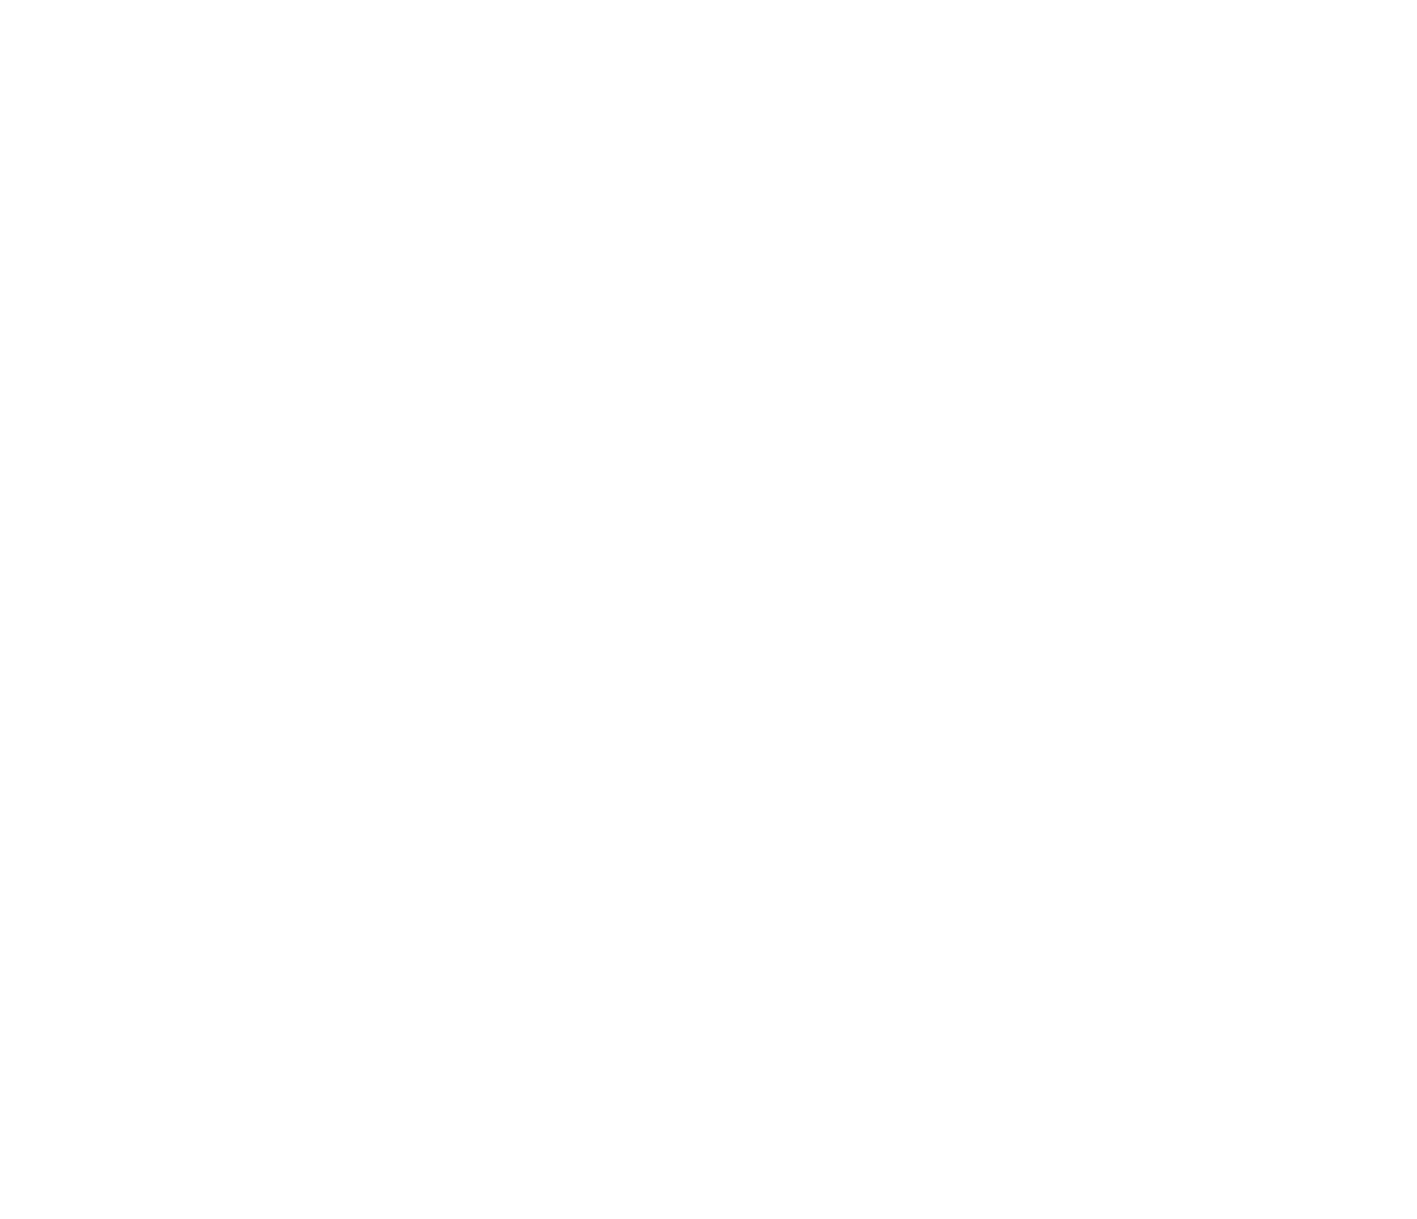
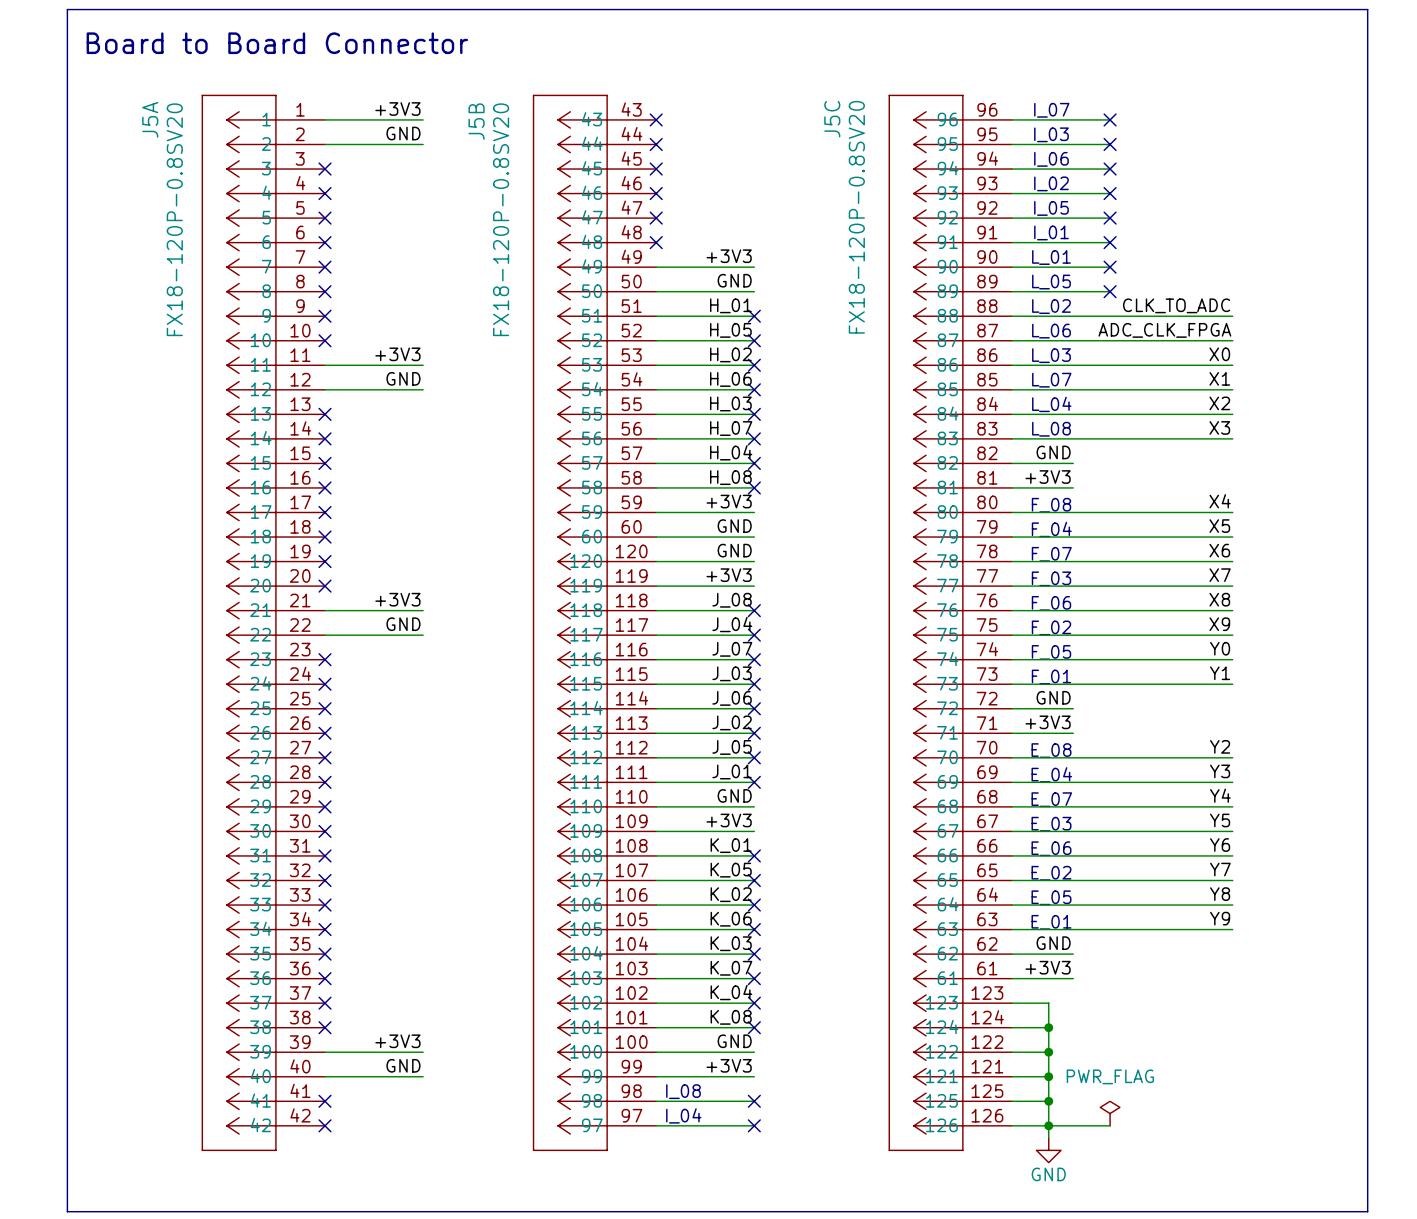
line: none -> (67, 9) (1367, 9) (1367, 1211) (67, 1211) (67, 9)
text: none -> Board to Board Connector (277, 43)
label: none -> +3V3 (397, 109)
text: none -> I_07 (1051, 110)
wire: none -> (324, 119) (423, 119)
no-connect mark: none -> (656, 119)
wire: none -> (1011, 119) (1110, 119)
no-connect mark: none -> (1110, 119)
label: none -> GND (403, 133)
text: none -> I_03 (1051, 134)
wire: none -> (324, 144) (423, 144)
no-connect mark: none -> (656, 144)
wire: none -> (1011, 144) (1110, 144)
no-connect mark: none -> (1110, 144)
text: none -> I_06 (1051, 159)
no-connect mark: none -> (324, 169)
no-connect mark: none -> (656, 169)
wire: none -> (1011, 169) (1110, 169)
no-connect mark: none -> (1110, 169)
text: none -> I_02 (1051, 183)
no-connect mark: none -> (324, 193)
no-connect mark: none -> (656, 193)
wire: none -> (1011, 193) (1110, 193)
no-connect mark: none -> (1110, 193)
text: none -> I_05 (1051, 208)
no-connect mark: none -> (324, 218)
no-connect mark: none -> (656, 218)
wire: none -> (1011, 218) (1110, 218)
no-connect mark: none -> (1110, 218)
text: none -> I_01 (1051, 232)
no-connect mark: none -> (324, 242)
no-connect mark: none -> (656, 242)
wire: none -> (1011, 242) (1110, 242)
no-connect mark: none -> (1110, 242)
label: none -> +3V3 (729, 256)
text: none -> L_01 (1051, 257)
no-connect mark: none -> (324, 267)
wire: none -> (656, 267) (754, 267)
wire: none -> (1011, 267) (1110, 267)
no-connect mark: none -> (1110, 267)
label: none -> GND (734, 280)
text: none -> L_05 (1051, 282)
no-connect mark: none -> (324, 291)
wire: none -> (656, 291) (754, 291)
wire: none -> (1011, 291) (1110, 291)
no-connect mark: none -> (1110, 291)
label: none -> H_01 (730, 305)
label: none -> CLK_TO_ADC (1176, 305)
text: none -> L_02 (1051, 306)
no-connect mark: none -> (324, 316)
wire: none -> (656, 316) (754, 316)
no-connect mark: none -> (754, 316)
wire: none -> (1011, 316) (1232, 316)
label: none -> H_05 (730, 330)
label: none -> ADC_CLK_FPGA (1164, 330)
text: none -> L_06 (1051, 331)
no-connect mark: none -> (324, 340)
wire: none -> (656, 340) (754, 340)
no-connect mark: none -> (754, 340)
wire: none -> (1011, 340) (1232, 340)
label: none -> +3V3 (397, 354)
label: none -> H_02 (730, 354)
label: none -> X0 (1219, 354)
text: none -> L_03 (1051, 355)
wire: none -> (324, 365) (423, 365)
wire: none -> (656, 365) (754, 365)
no-connect mark: none -> (754, 365)
wire: none -> (1011, 365) (1232, 365)
label: none -> GND (403, 378)
label: none -> X1 (1219, 378)
label: none -> H_06 (730, 379)
text: none -> L_07 (1051, 380)
wire: none -> (324, 389) (423, 389)
wire: none -> (656, 389) (754, 389)
no-connect mark: none -> (754, 389)
wire: none -> (1011, 389) (1232, 389)
label: none -> H_03 (730, 403)
label: none -> X2 (1219, 403)
text: none -> L_04 (1051, 404)
no-connect mark: none -> (324, 414)
wire: none -> (656, 414) (754, 414)
no-connect mark: none -> (754, 414)
wire: none -> (1011, 414) (1232, 414)
label: none -> X3 (1219, 427)
label: none -> H_07 (731, 428)
text: none -> L_08 (1051, 429)
no-connect mark: none -> (324, 438)
wire: none -> (656, 438) (754, 438)
no-connect mark: none -> (754, 438)
wire: none -> (1011, 438) (1232, 438)
label: none -> H_04 (731, 452)
label: none -> GND (1053, 452)
no-connect mark: none -> (324, 463)
wire: none -> (656, 463) (754, 463)
no-connect mark: none -> (754, 463)
wire: none -> (1011, 463) (1073, 463)
label: none -> H_08 (730, 477)
label: none -> +3V3 (1048, 477)
no-connect mark: none -> (324, 487)
wire: none -> (656, 487) (754, 487)
no-connect mark: none -> (754, 487)
wire: none -> (1011, 487) (1073, 487)
label: none -> +3V3 (729, 501)
label: none -> X4 (1220, 501)
text: none -> F_08 (1051, 505)
no-connect mark: none -> (324, 512)
wire: none -> (656, 512) (754, 512)
wire: none -> (1011, 512) (1232, 512)
label: none -> GND (734, 526)
label: none -> X5 (1219, 526)
text: none -> F_04 (1051, 529)
no-connect mark: none -> (324, 537)
wire: none -> (656, 537) (754, 537)
wire: none -> (1011, 537) (1232, 537)
label: none -> GND (734, 550)
label: none -> X6 (1219, 550)
text: none -> F_07 (1051, 554)
no-connect mark: none -> (324, 561)
wire: none -> (656, 561) (754, 561)
wire: none -> (1011, 561) (1232, 561)
label: none -> +3V3 (729, 575)
label: none -> X7 (1220, 575)
text: none -> F_03 (1051, 578)
no-connect mark: none -> (324, 586)
wire: none -> (656, 586) (754, 586)
wire: none -> (1011, 586) (1232, 586)
label: none -> +3V3 (397, 599)
label: none -> X8 (1219, 599)
label: none -> J_08 (732, 600)
text: none -> F_06 (1051, 603)
wire: none -> (324, 610) (423, 610)
wire: none -> (656, 610) (754, 610)
no-connect mark: none -> (754, 610)
wire: none -> (1011, 610) (1232, 610)
J5A: none -> FX18-120P-0.8SV20 (263, 622)
J5B: none -> FX18-120P-0.8SV20 (594, 622)
J5C: none -> FX18-120P-0.8SV20 (950, 622)
label: none -> GND (403, 624)
label: none -> J_04 (732, 624)
label: none -> X9 (1219, 624)
text: none -> F_02 (1051, 627)
wire: none -> (324, 635) (423, 635)
wire: none -> (656, 635) (754, 635)
no-connect mark: none -> (754, 635)
wire: none -> (1011, 635) (1232, 635)
label: none -> Y0 (1220, 648)
label: none -> J_07 (732, 649)
text: none -> F_05 (1051, 652)
no-connect mark: none -> (324, 659)
wire: none -> (656, 659) (754, 659)
no-connect mark: none -> (754, 659)
wire: none -> (1011, 659) (1232, 659)
label: none -> J_03 (732, 673)
label: none -> Y1 (1220, 673)
text: none -> F_01 (1051, 677)
no-connect mark: none -> (324, 684)
wire: none -> (656, 684) (754, 684)
no-connect mark: none -> (754, 684)
wire: none -> (1011, 684) (1232, 684)
label: none -> GND (1053, 697)
label: none -> J_06 (732, 698)
no-connect mark: none -> (324, 708)
wire: none -> (656, 708) (754, 708)
no-connect mark: none -> (754, 708)
wire: none -> (1011, 708) (1073, 708)
label: none -> J_02 (732, 722)
label: none -> +3V3 (1048, 722)
no-connect mark: none -> (324, 733)
wire: none -> (656, 733) (754, 733)
no-connect mark: none -> (754, 733)
wire: none -> (1011, 733) (1073, 733)
label: none -> Y2 (1220, 746)
label: none -> J_05 (732, 747)
text: none -> E_08 (1051, 750)
no-connect mark: none -> (324, 757)
wire: none -> (656, 757) (754, 757)
no-connect mark: none -> (754, 757)
wire: none -> (1011, 757) (1232, 757)
label: none -> Y3 (1220, 771)
label: none -> J_01 (732, 772)
text: none -> E_04 (1051, 774)
no-connect mark: none -> (324, 782)
wire: none -> (656, 782) (754, 782)
no-connect mark: none -> (754, 782)
wire: none -> (1011, 782) (1232, 782)
label: none -> GND (734, 795)
label: none -> Y4 (1220, 795)
text: none -> E_07 (1051, 799)
no-connect mark: none -> (324, 806)
wire: none -> (656, 806) (754, 806)
wire: none -> (1011, 806) (1232, 806)
label: none -> +3V3 (729, 820)
label: none -> Y5 (1220, 820)
text: none -> E_03 (1051, 824)
no-connect mark: none -> (324, 831)
wire: none -> (656, 831) (754, 831)
wire: none -> (1011, 831) (1232, 831)
label: none -> K_01 (731, 845)
label: none -> Y6 (1220, 845)
text: none -> E_06 (1051, 848)
no-connect mark: none -> (324, 855)
wire: none -> (656, 855) (754, 855)
no-connect mark: none -> (754, 855)
wire: none -> (1011, 855) (1232, 855)
label: none -> Y7 (1220, 869)
label: none -> K_05 (731, 870)
text: none -> E_02 (1051, 873)
no-connect mark: none -> (324, 880)
wire: none -> (656, 880) (754, 880)
no-connect mark: none -> (754, 880)
wire: none -> (1011, 880) (1232, 880)
label: none -> K_02 (731, 894)
label: none -> Y8 (1220, 894)
text: none -> E_05 (1051, 897)
no-connect mark: none -> (324, 905)
wire: none -> (656, 905) (754, 905)
no-connect mark: none -> (754, 905)
wire: none -> (1011, 905) (1232, 905)
label: none -> Y9 (1220, 918)
label: none -> K_06 (731, 919)
text: none -> E_01 (1051, 922)
no-connect mark: none -> (324, 929)
wire: none -> (656, 929) (754, 929)
no-connect mark: none -> (754, 929)
wire: none -> (1011, 929) (1232, 929)
label: none -> K_03 (731, 943)
label: none -> GND (1053, 943)
no-connect mark: none -> (324, 954)
wire: none -> (656, 954) (754, 954)
no-connect mark: none -> (754, 954)
wire: none -> (1011, 954) (1073, 954)
label: none -> +3V3 (1048, 967)
label: none -> K_07 (731, 968)
no-connect mark: none -> (324, 978)
wire: none -> (656, 978) (754, 978)
no-connect mark: none -> (754, 978)
wire: none -> (1011, 978) (1073, 978)
label: none -> K_04 (731, 992)
no-connect mark: none -> (324, 1003)
wire: none -> (656, 1003) (754, 1003)
no-connect mark: none -> (754, 1003)
wire: none -> (1011, 1003) (1048, 1003) (1048, 1138)
label: none -> K_08 (731, 1017)
no-connect mark: none -> (324, 1027)
wire: none -> (656, 1027) (754, 1027)
no-connect mark: none -> (754, 1027)
wire: none -> (1011, 1027) (1048, 1027)
junction: none -> (1048, 1027)
label: none -> +3V3 (397, 1041)
label: none -> GND (734, 1041)
wire: none -> (324, 1052) (423, 1052)
wire: none -> (656, 1052) (754, 1052)
wire: none -> (1011, 1052) (1048, 1052)
junction: none -> (1048, 1052)
label: none -> GND (403, 1065)
label: none -> +3V3 (729, 1065)
wire: none -> (324, 1076) (423, 1076)
wire: none -> (656, 1076) (754, 1076)
wire: none -> (1011, 1076) (1048, 1076)
junction: none -> (1048, 1076)
text: none -> I_08 (683, 1091)
no-connect mark: none -> (324, 1101)
wire: none -> (656, 1101) (754, 1101)
no-connect mark: none -> (754, 1101)
wire: none -> (1011, 1101) (1048, 1101)
junction: none -> (1048, 1101)
power symbol: none -> PWR_FLAG (1110, 1113)
text: none -> I_04 (683, 1115)
no-connect mark: none -> (324, 1125)
wire: none -> (656, 1125) (754, 1125)
no-connect mark: none -> (754, 1125)
wire: none -> (1011, 1125) (1110, 1125)
junction: none -> (1048, 1125)
power symbol: none -> GND (1048, 1150)

